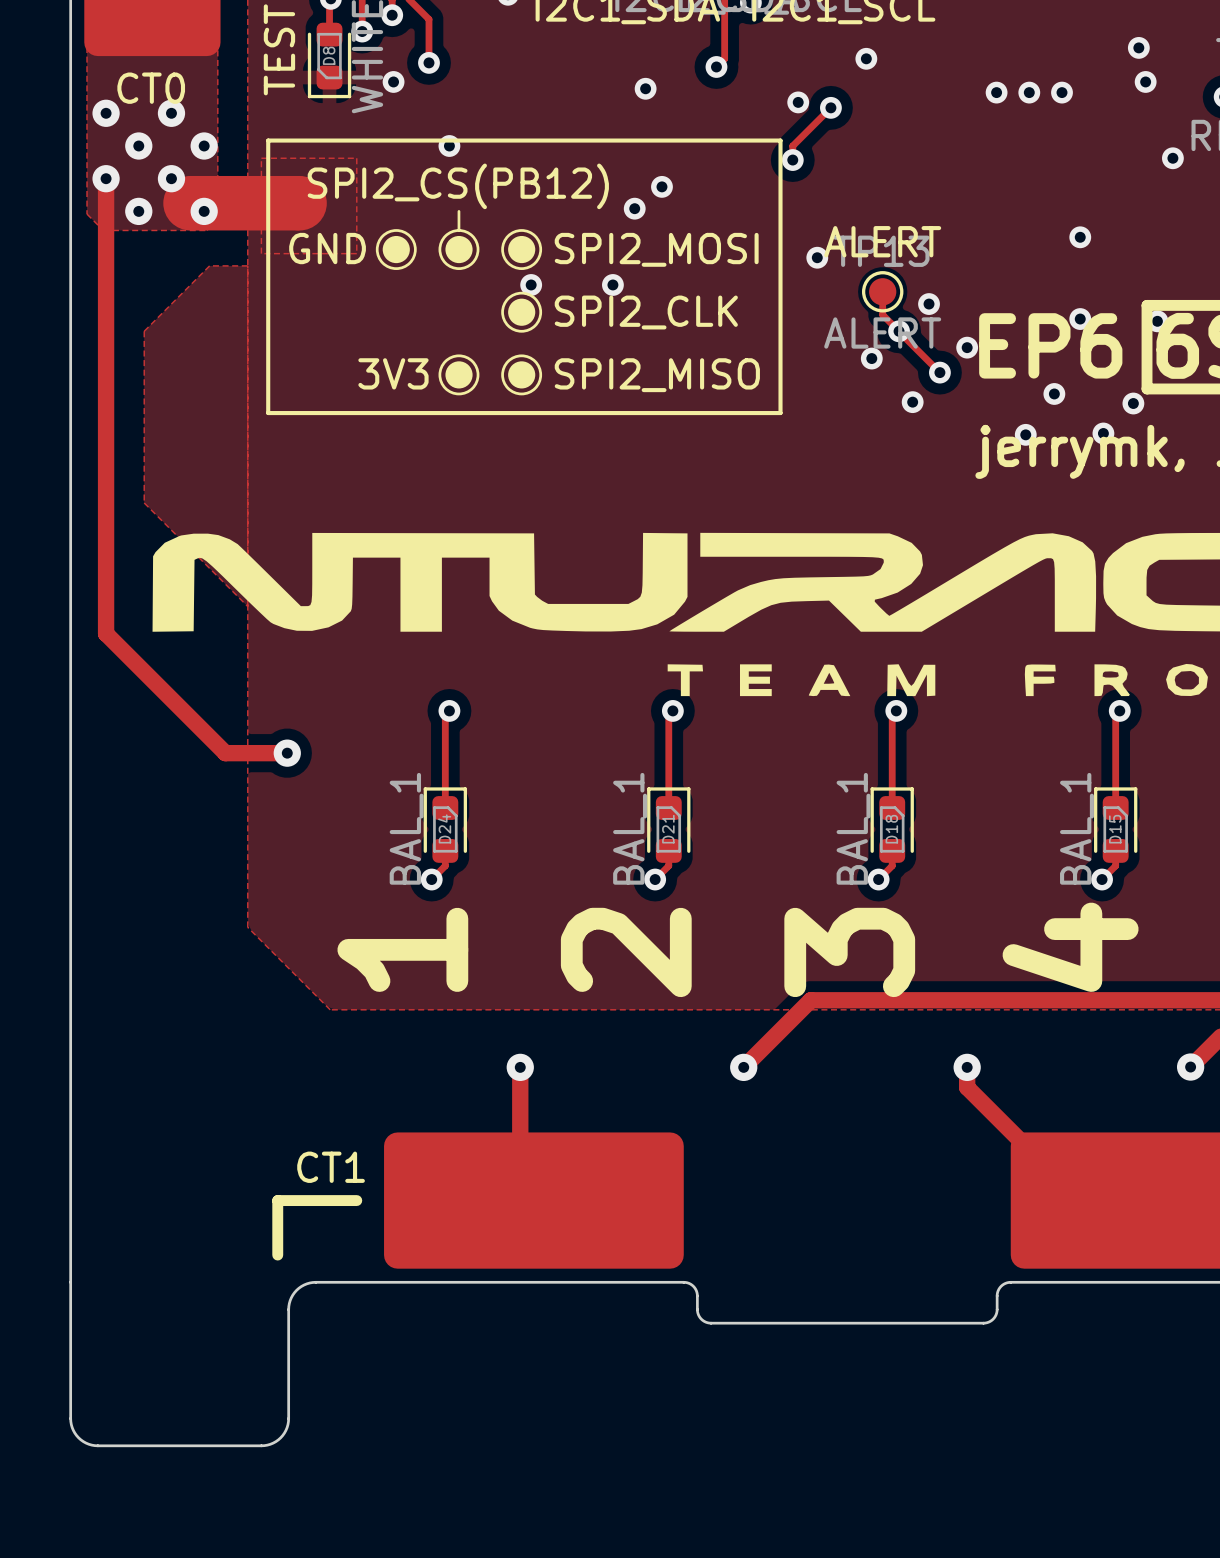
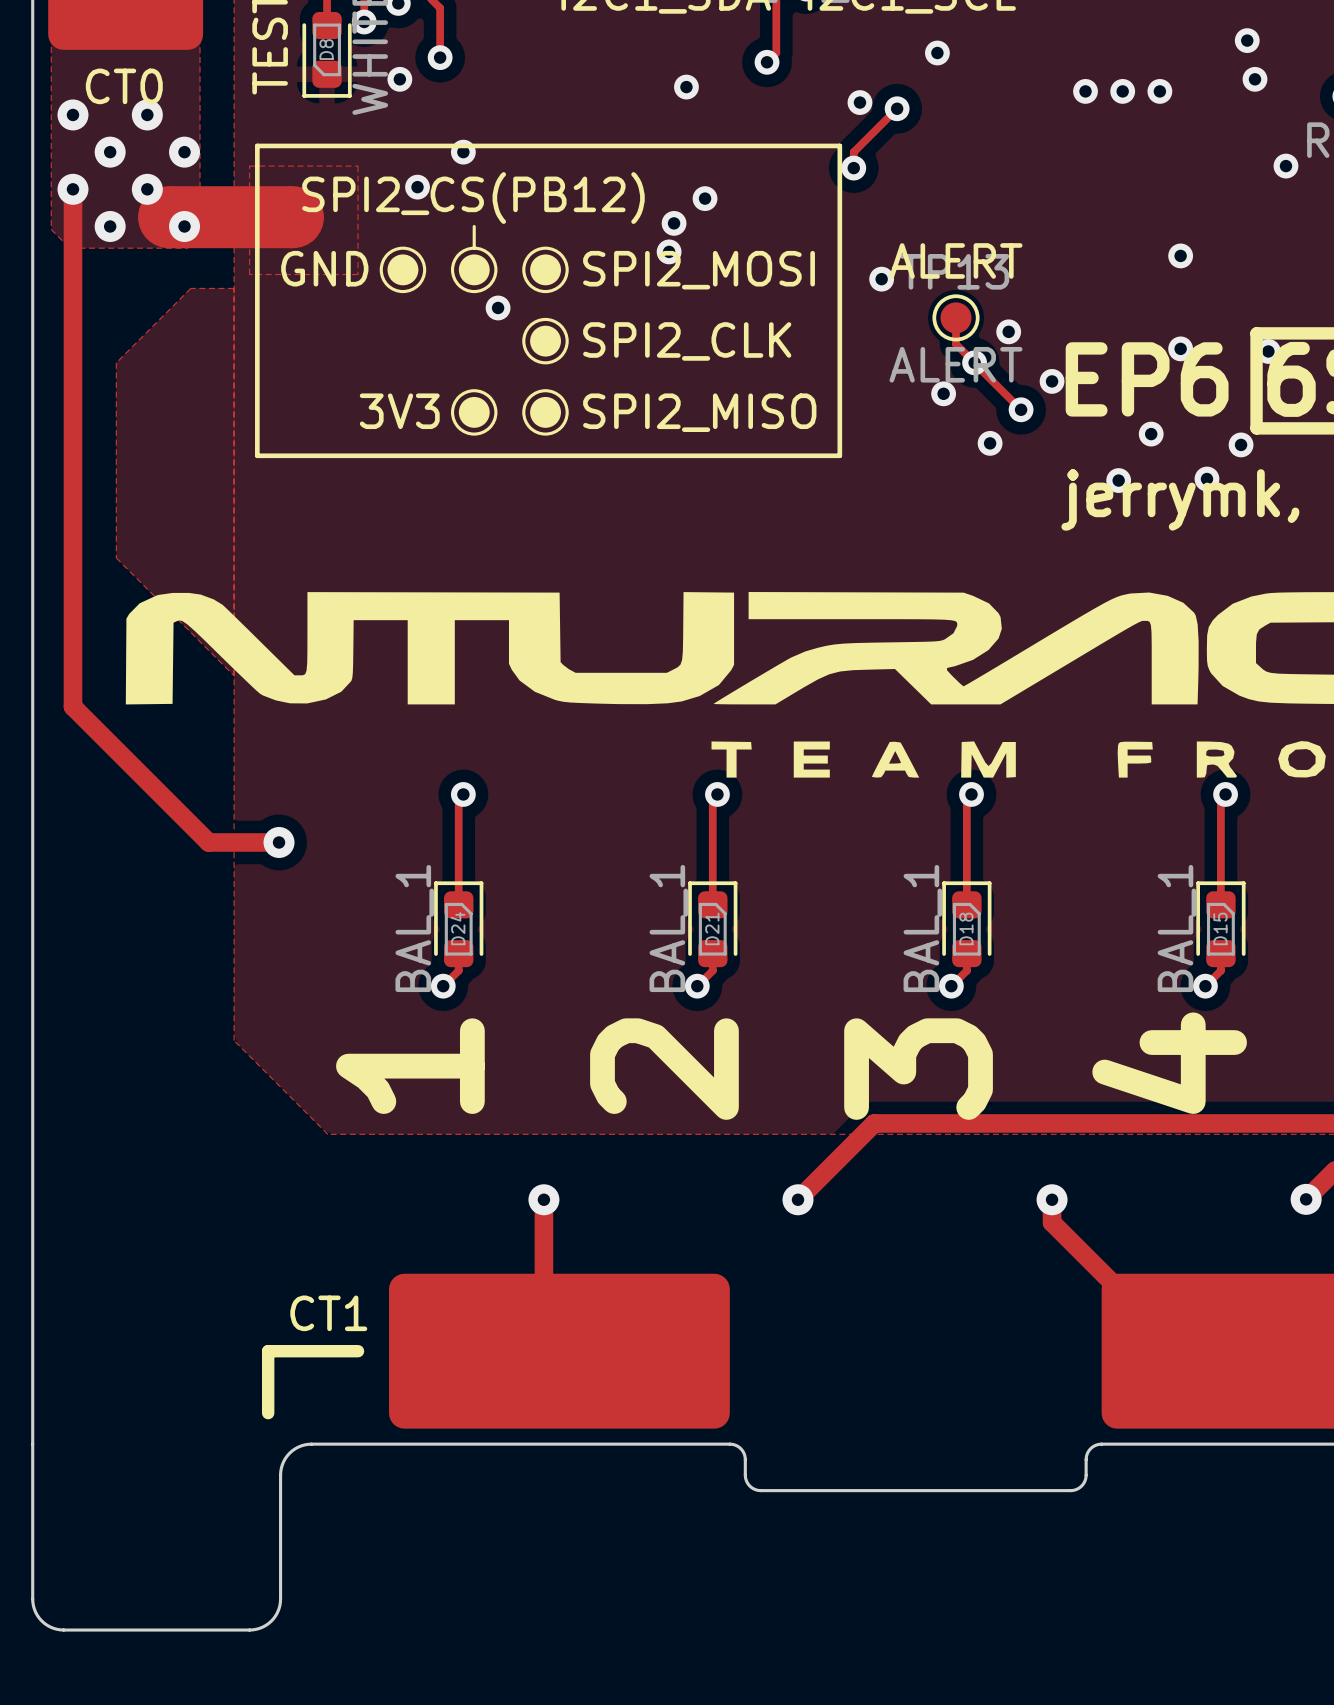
via: none -> (417, 187)
via position: (531, 284) -> (498, 307)
via position: (612, 284) -> (669, 251)

